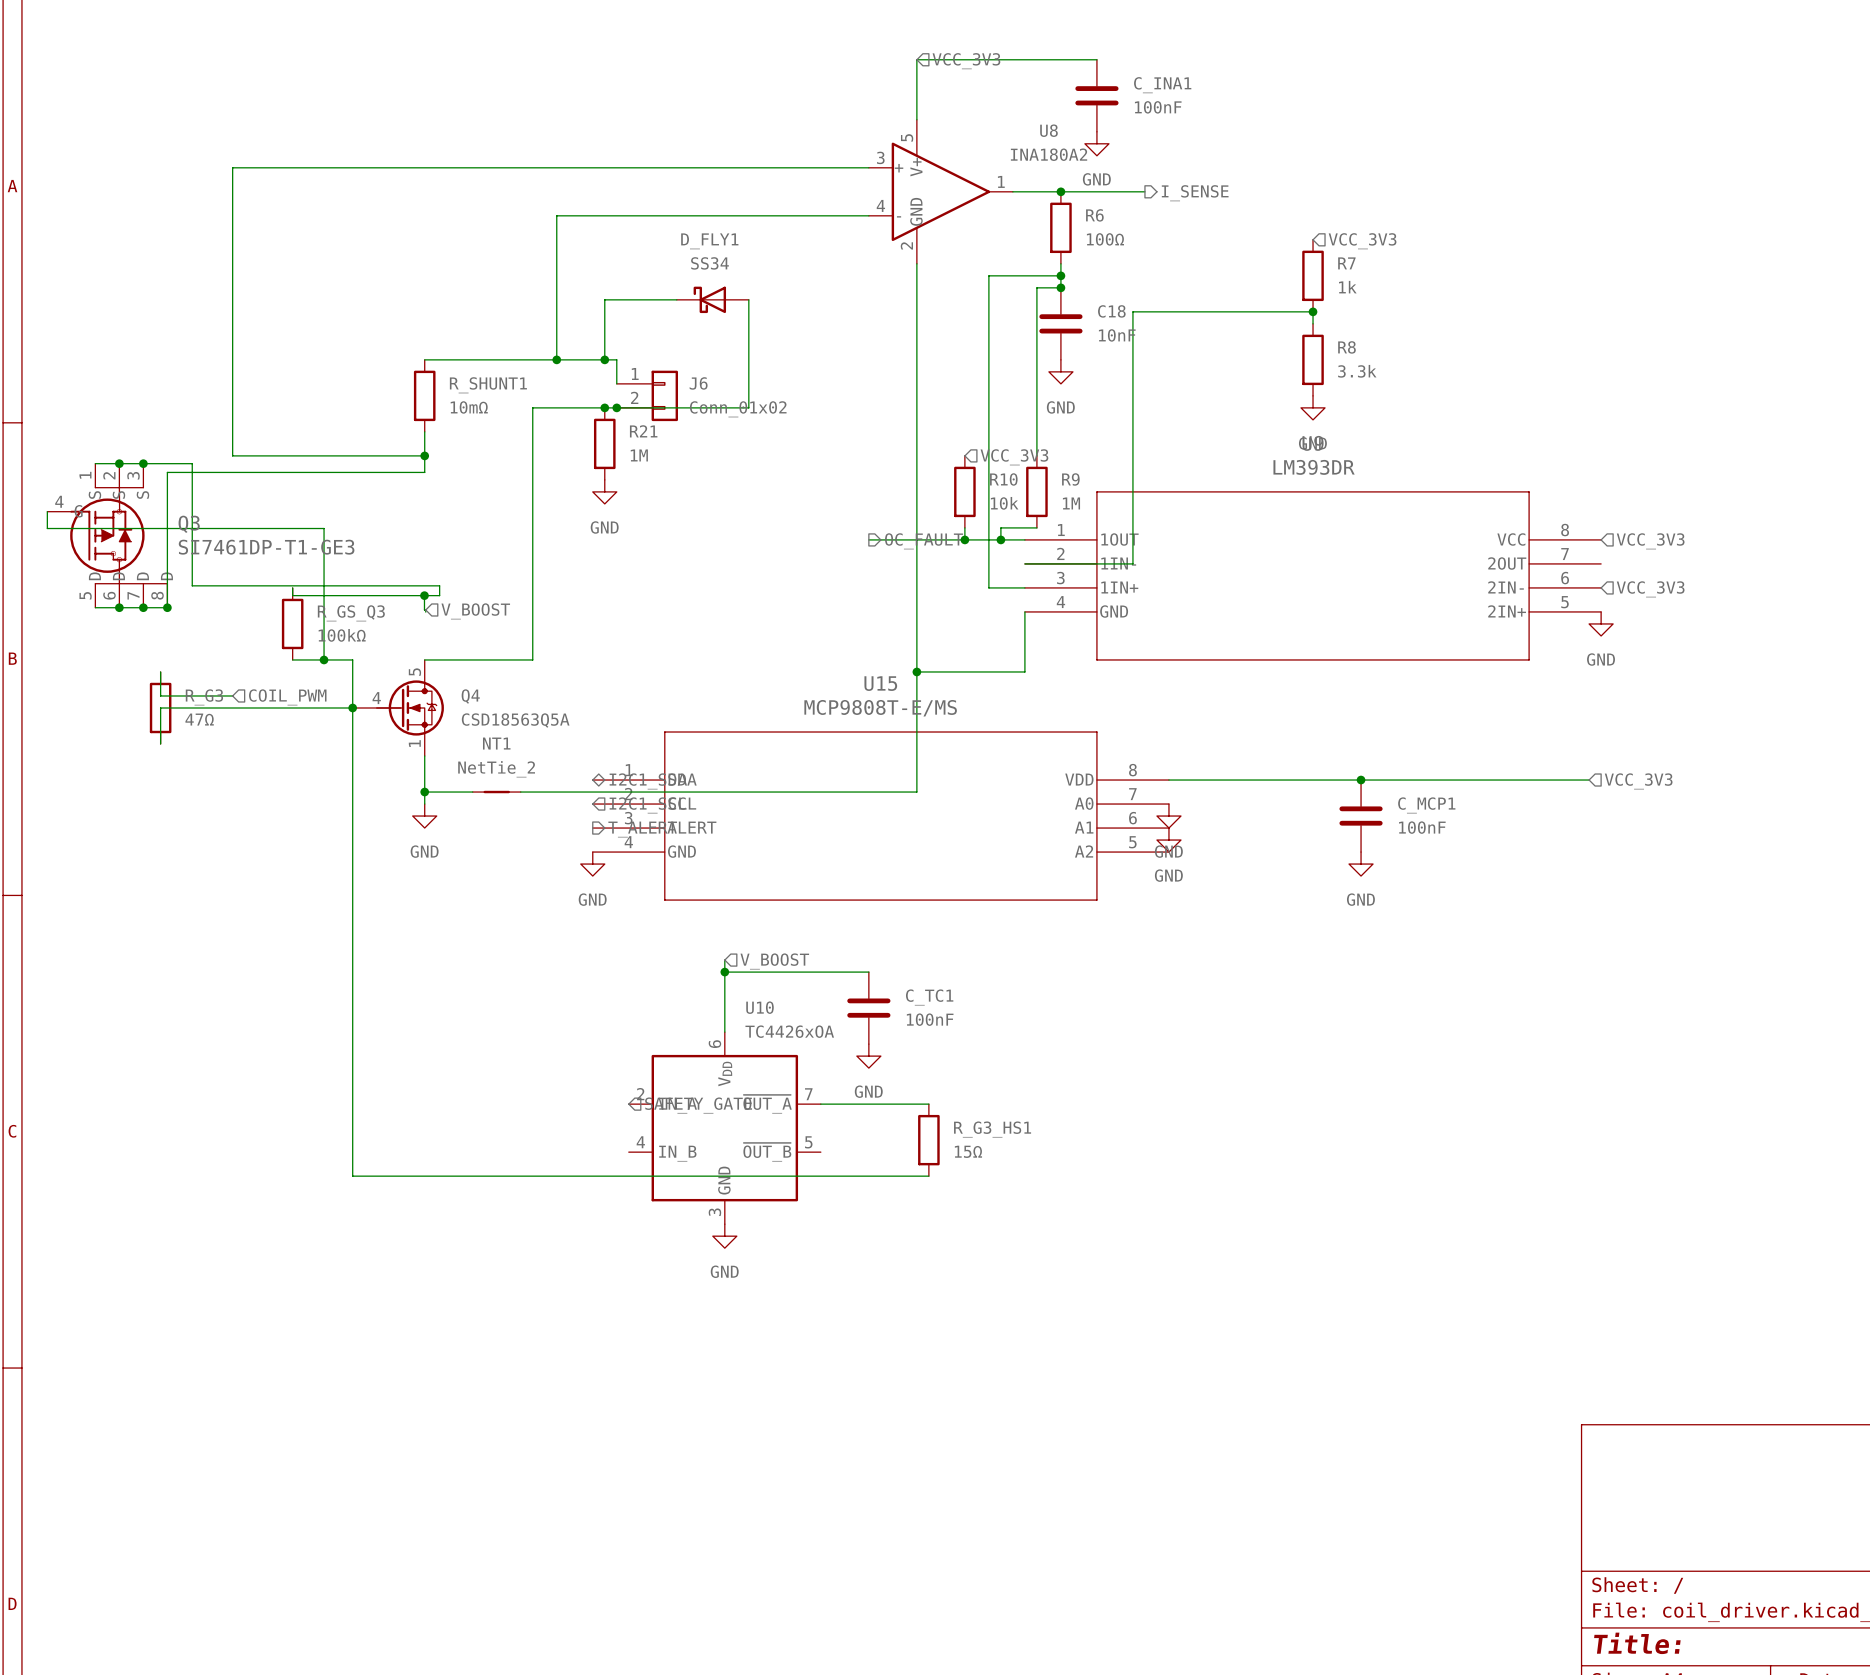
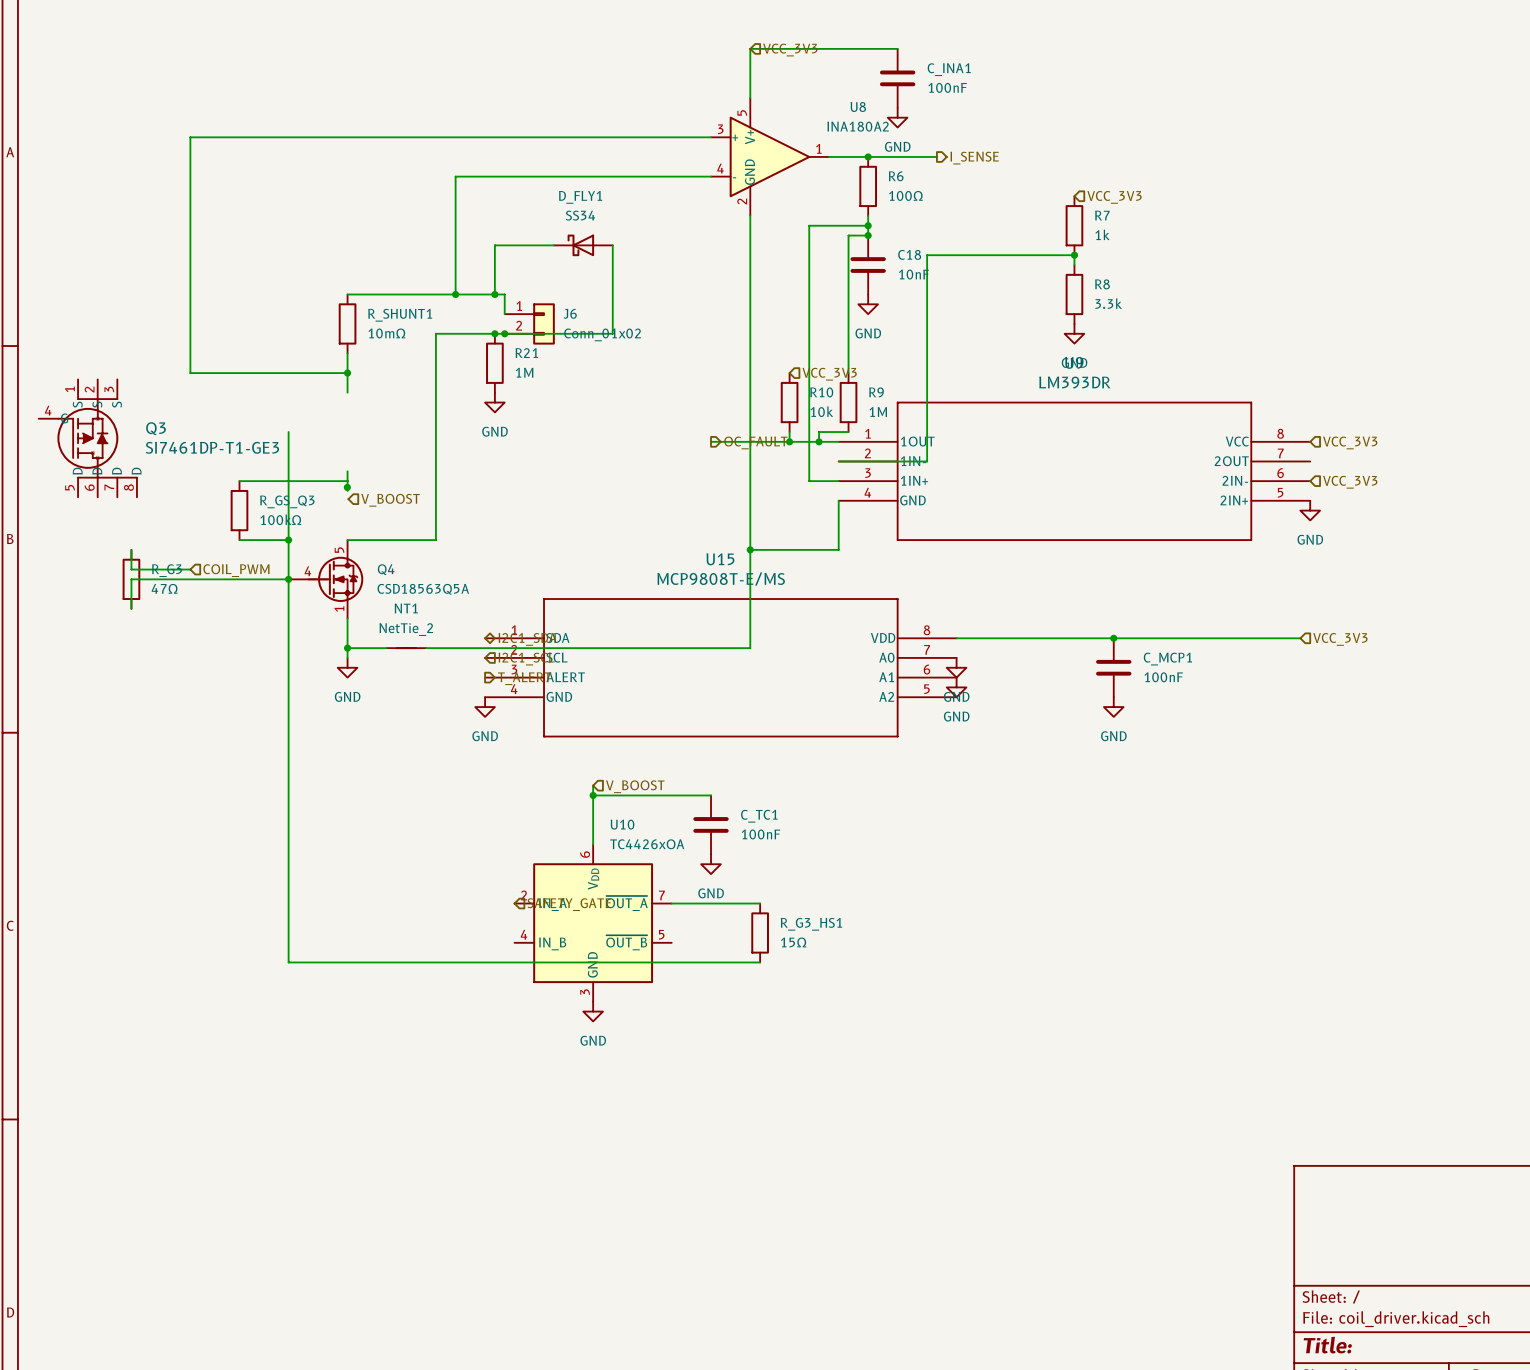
wire: (95, 463) (192, 463) (192, 585) (439, 585) (439, 595) (292, 595) (292, 587) -> (347, 481) (239, 481)
junction: (119, 463) -> none
junction: (143, 463) -> none
wire: (424, 472) (167, 472) (167, 607) (95, 607) -> (347, 386) (347, 392)
wire: (47, 511) (47, 528) (324, 528) (324, 660) -> none
wire: none -> (288, 432) (288, 540)
wire: none -> (347, 471) (347, 490)
wire: (424, 595) (425, 612) -> none
junction: (119, 607) -> none
junction: (143, 607) -> none
junction: (167, 607) -> none
junction position: (324, 659) -> (288, 540)

